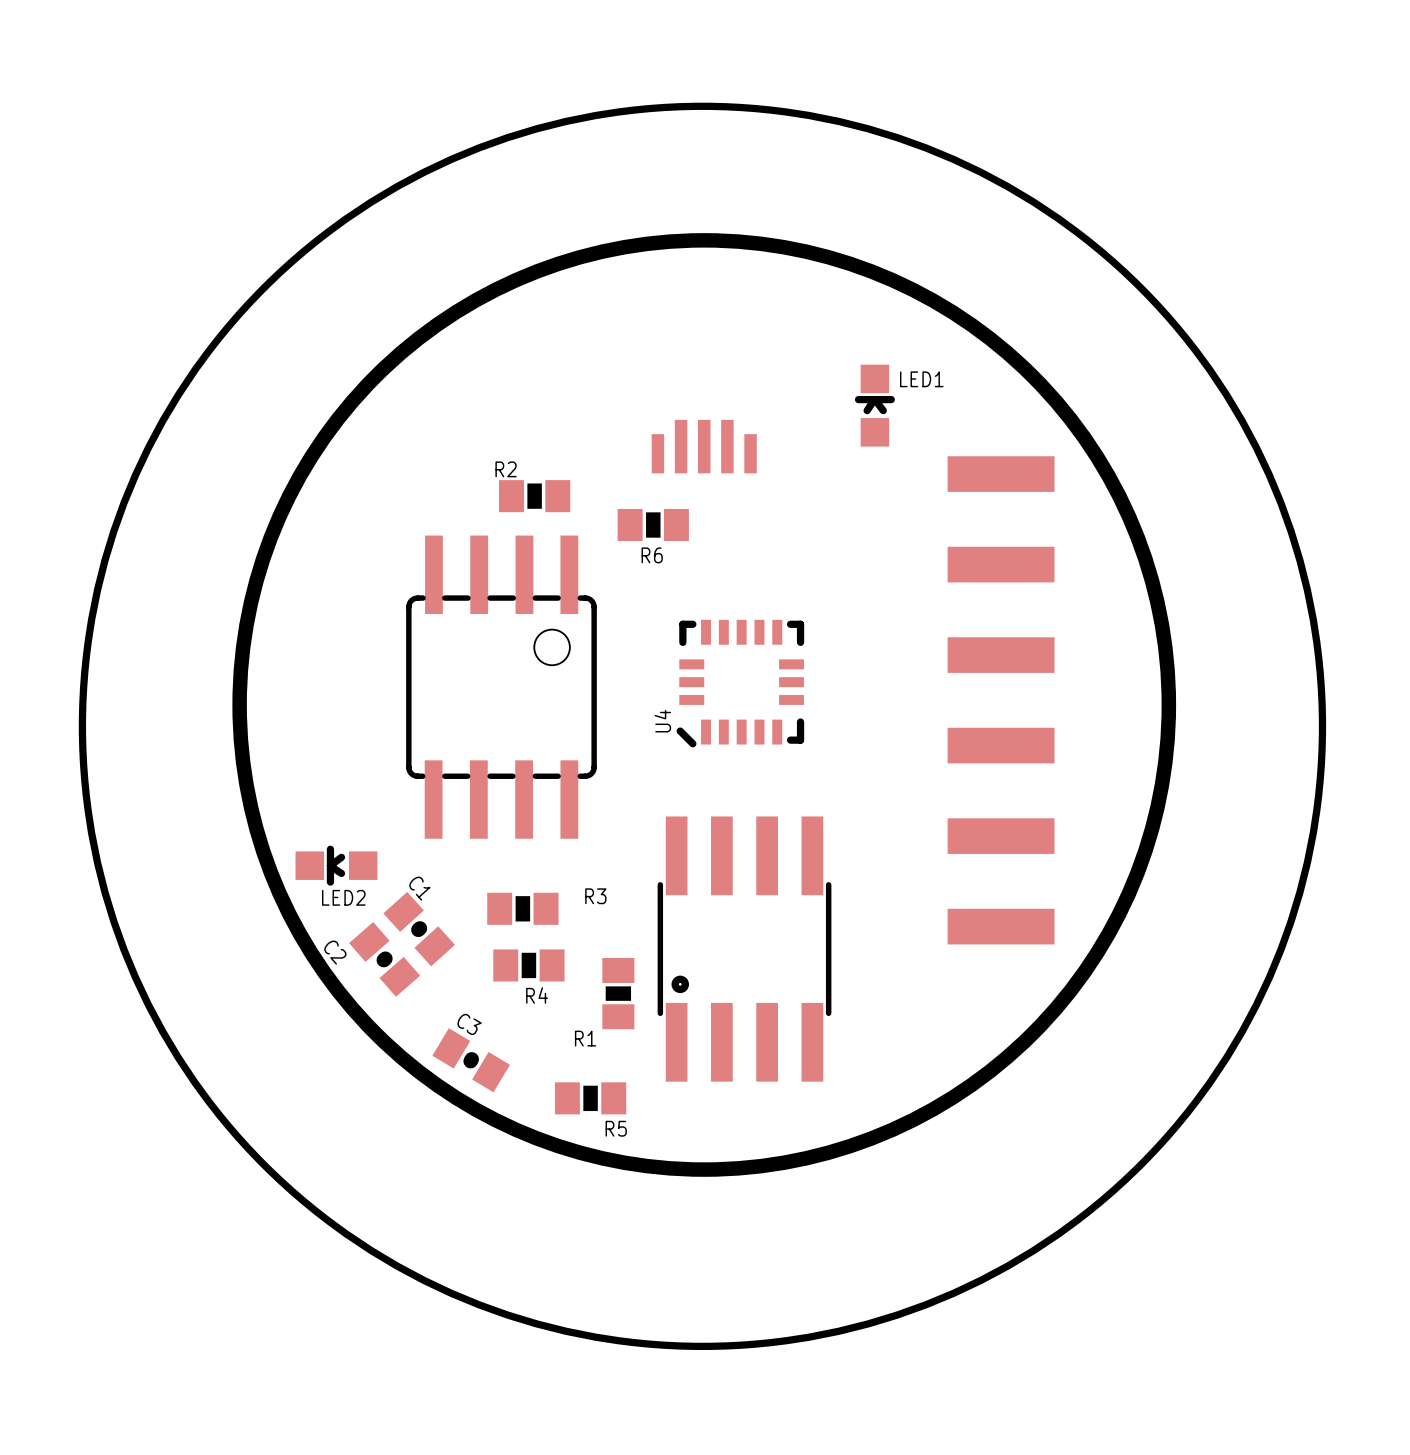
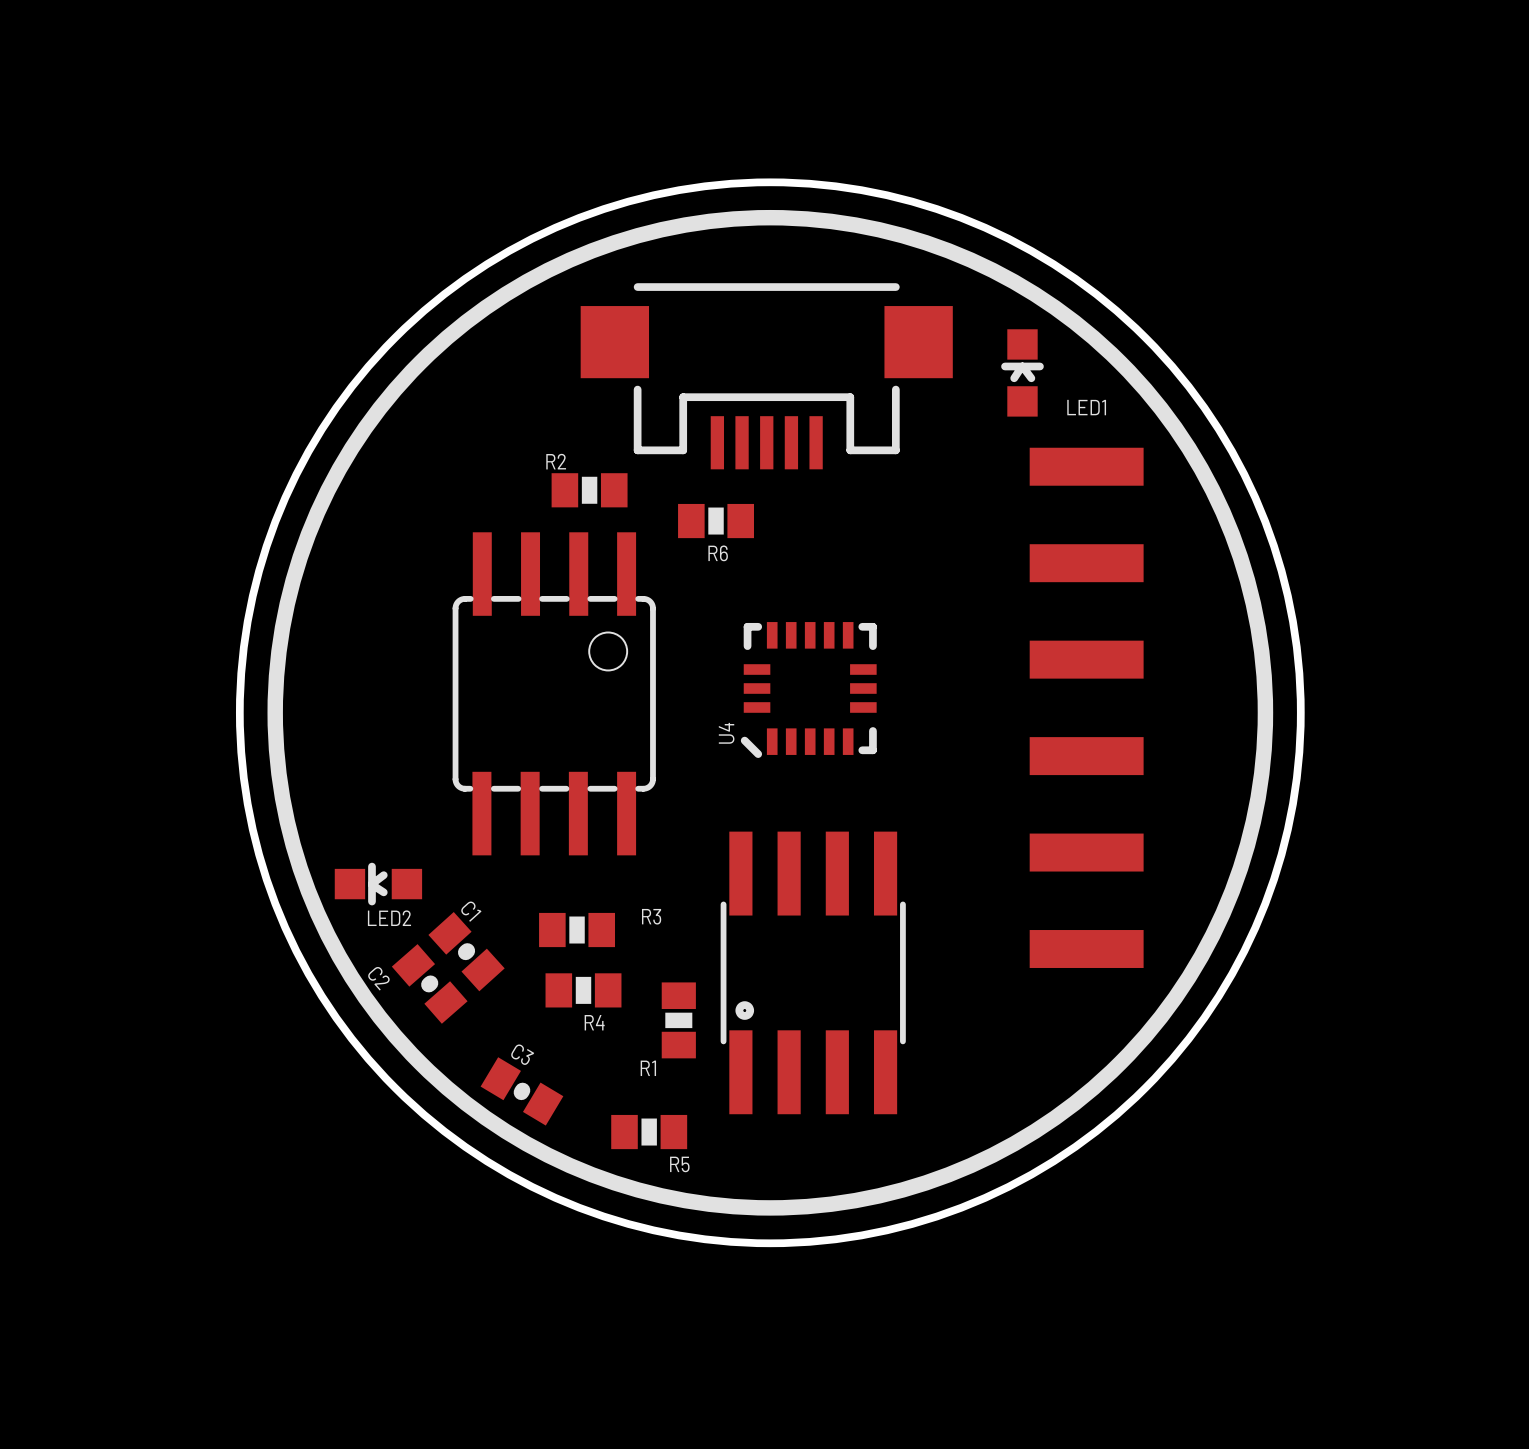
round board edge size: [78, 102, 1327, 1351] -> [235, 178, 1305, 1248]
LED1 name position: LED1 (921, 379) -> LED1 (1086, 407)
part: none -> (766, 376)
LED1 position: (874, 405) -> (1022, 372)
part: (704, 446) -> none

